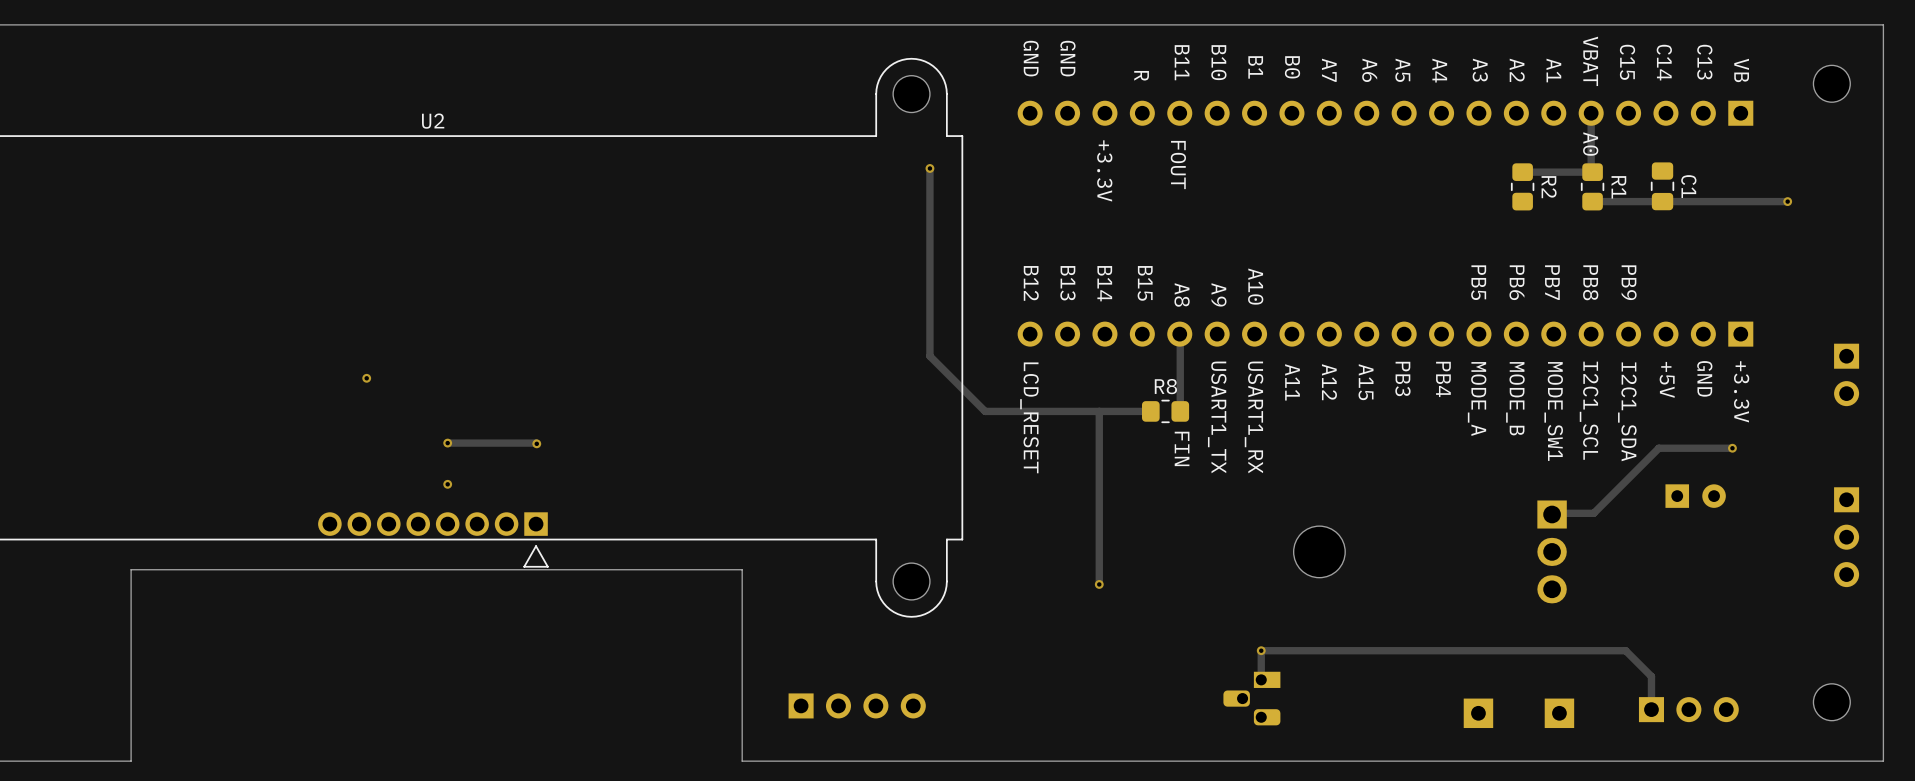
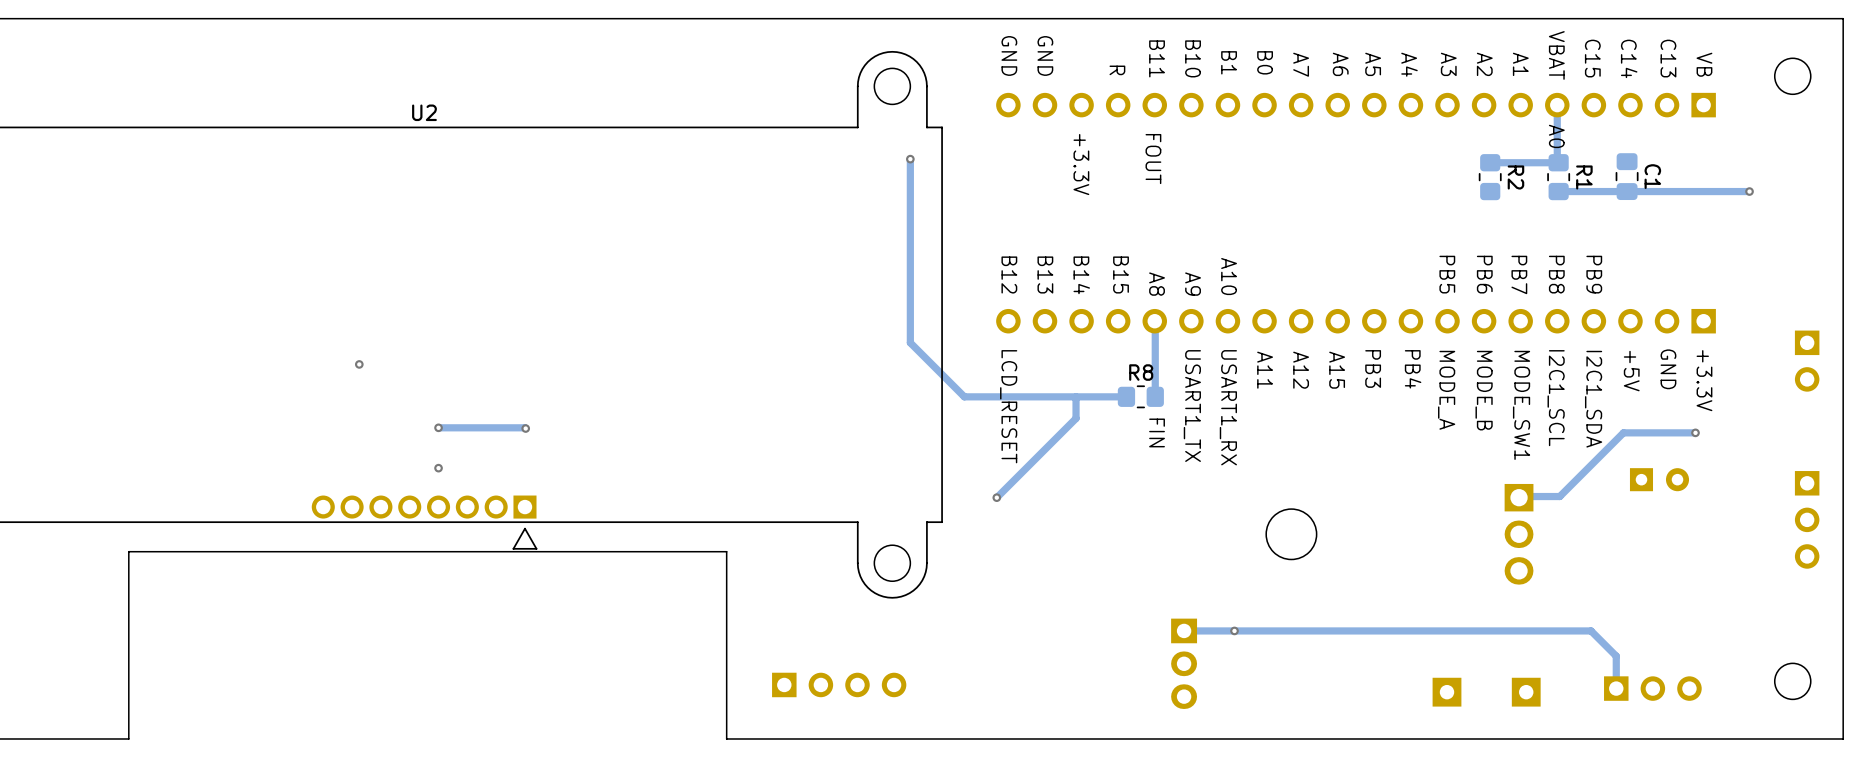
track: (1099, 433) (1099, 584) -> (1076, 418) (996, 497)
via: none -> (996, 497)
via: (1099, 584) -> none
track: (1261, 650) (1261, 679) -> (1234, 630) (1184, 630)
part: none -> (1184, 663)
part: (1251, 698) -> none

